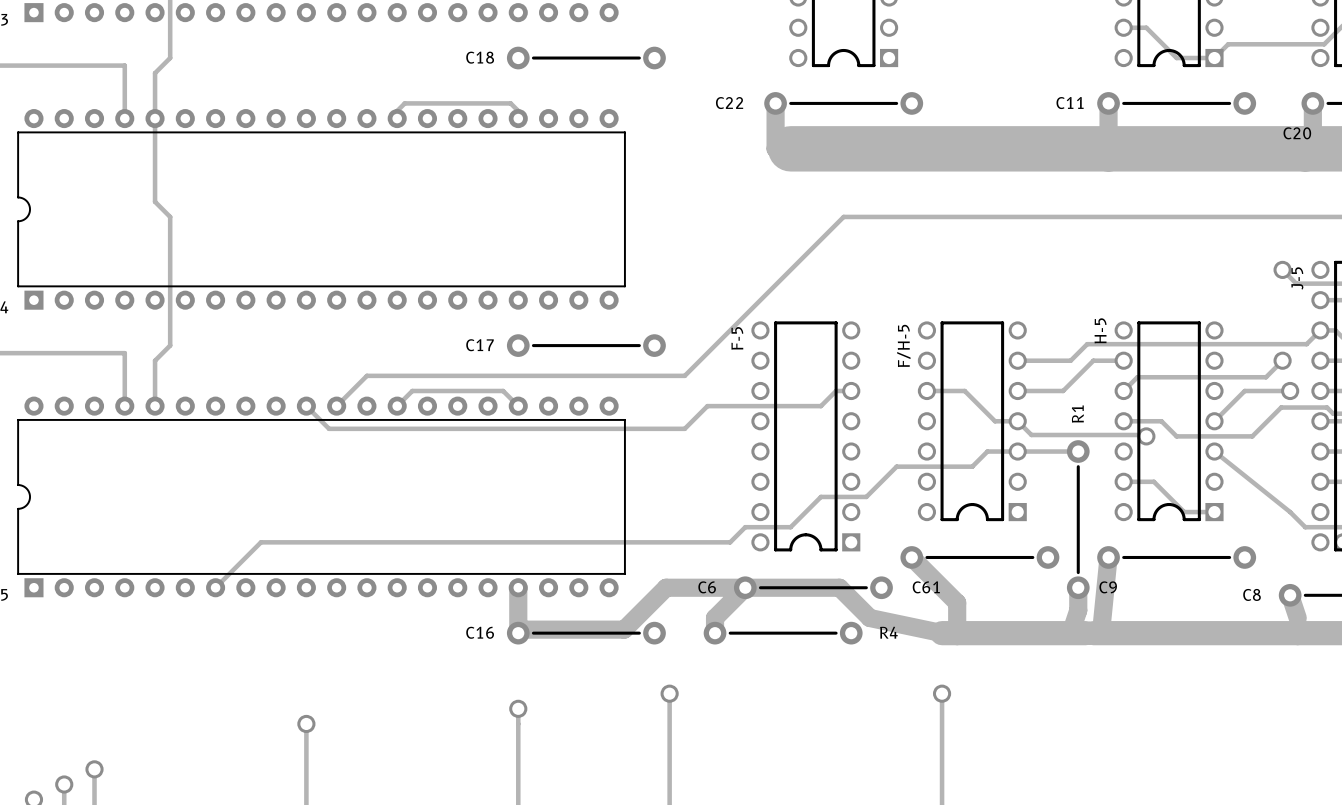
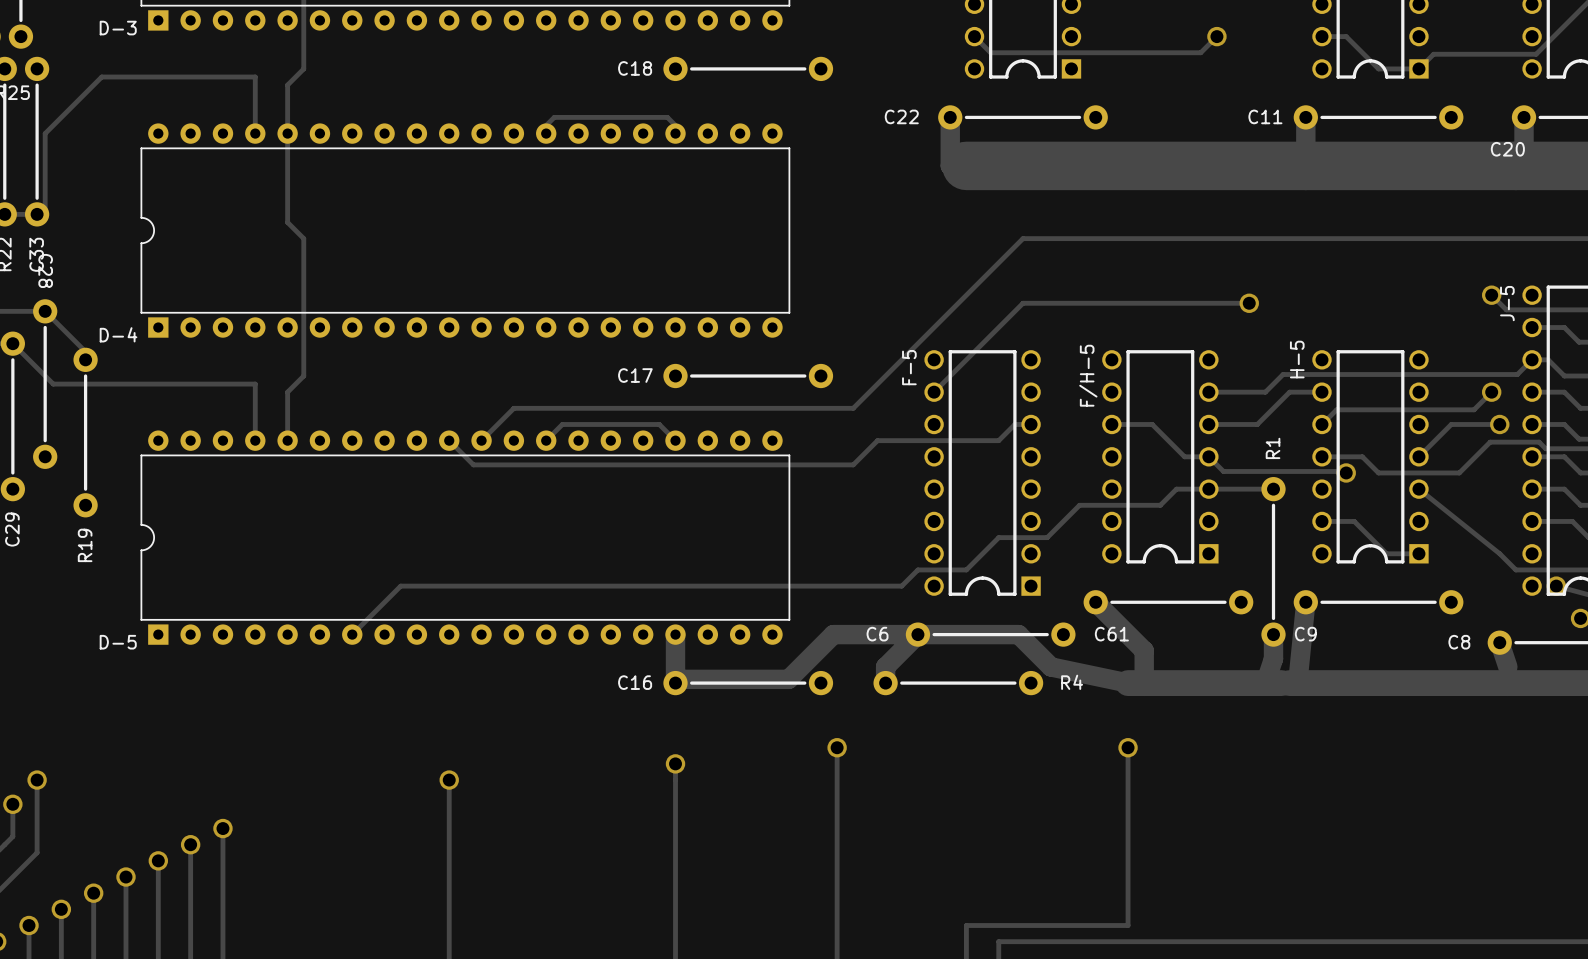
track: none -> (974, 36) (990, 52) (1200, 52) (1216, 36)
via: none -> (1216, 36)
track: none -> (1249, 303) (1022, 303) (934, 392)
via: none -> (1249, 303)

